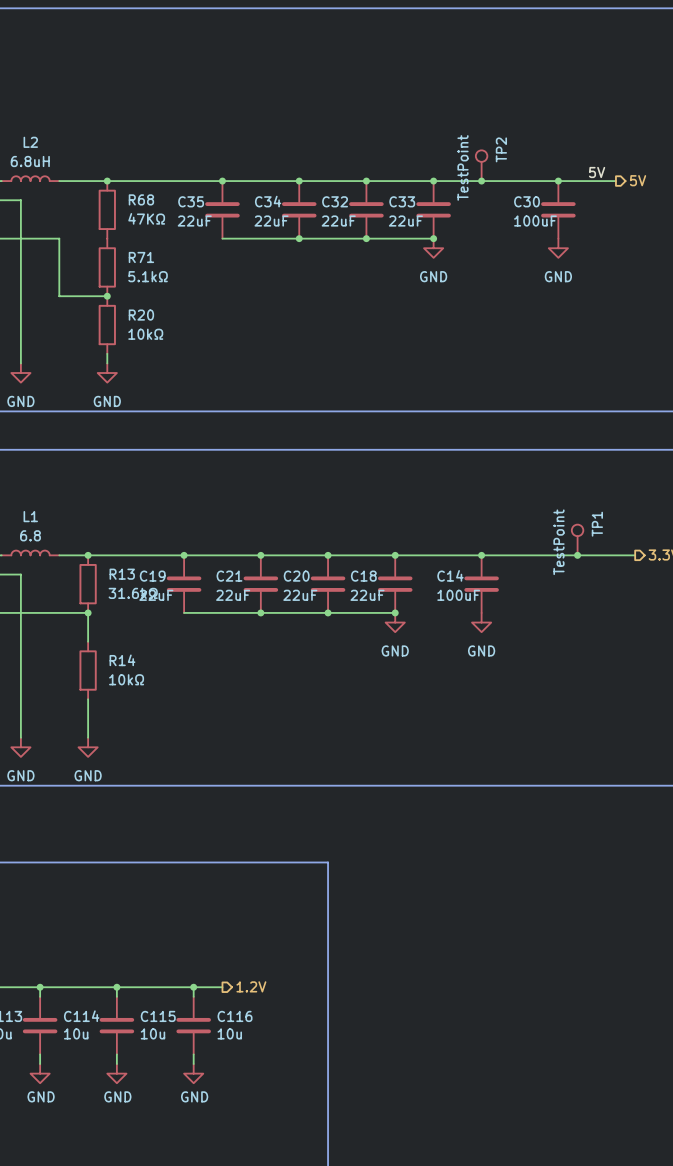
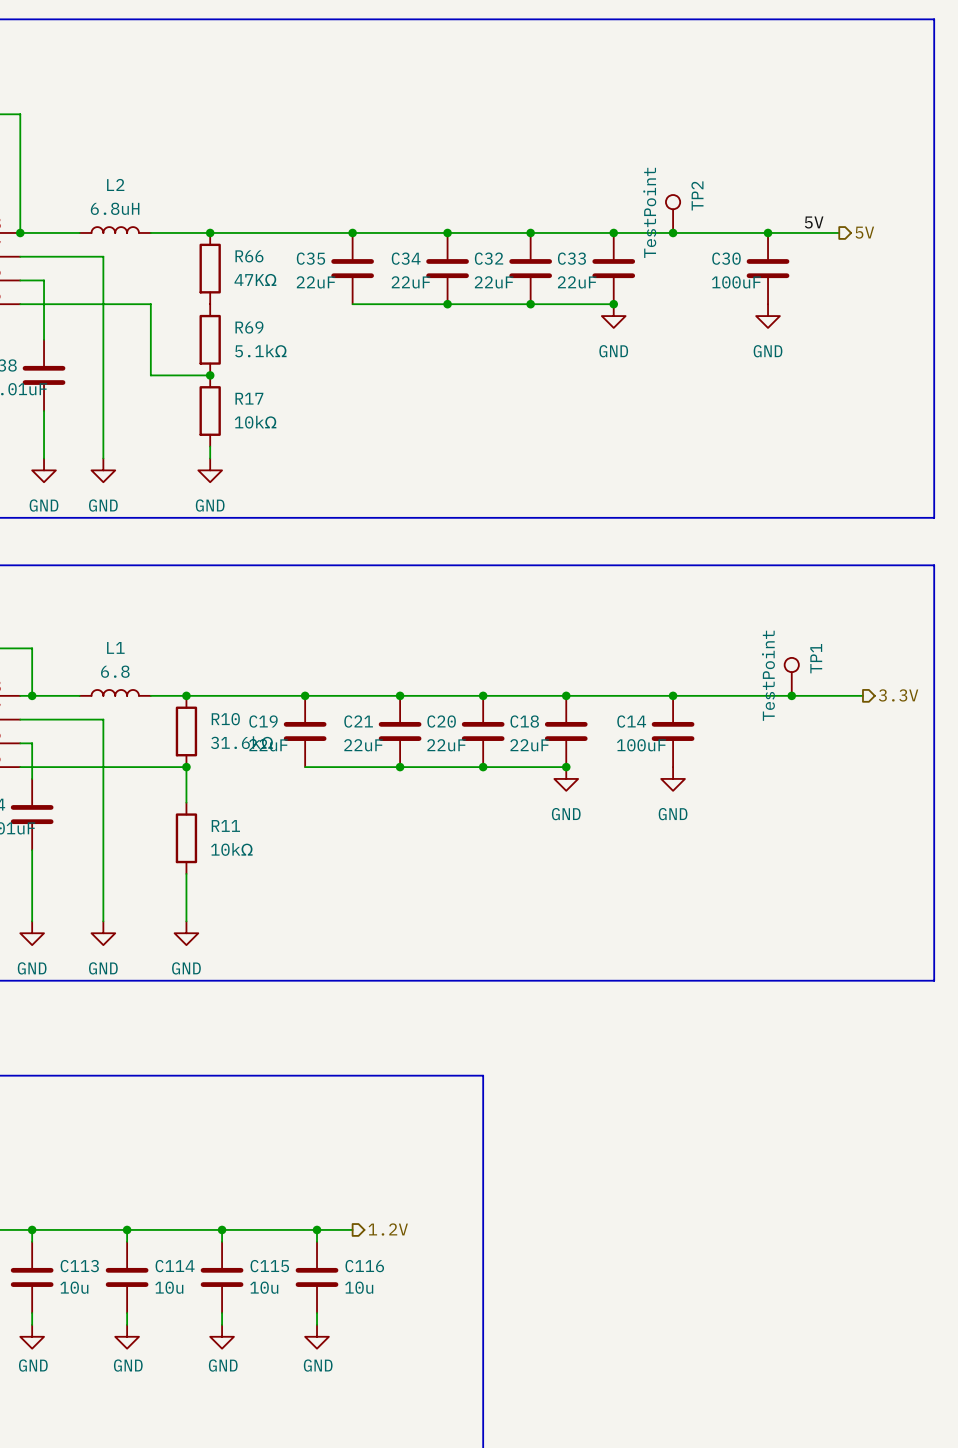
R68 name: R68 (141, 199) -> R66 (249, 256)
R71 name: R71 (141, 257) -> R69 (249, 327)
R20 name: R20 (141, 315) -> R17 (249, 398)
R13 name: R13 (122, 574) -> R10 (225, 719)
R14 name: R14 (122, 660) -> R11 (225, 825)

